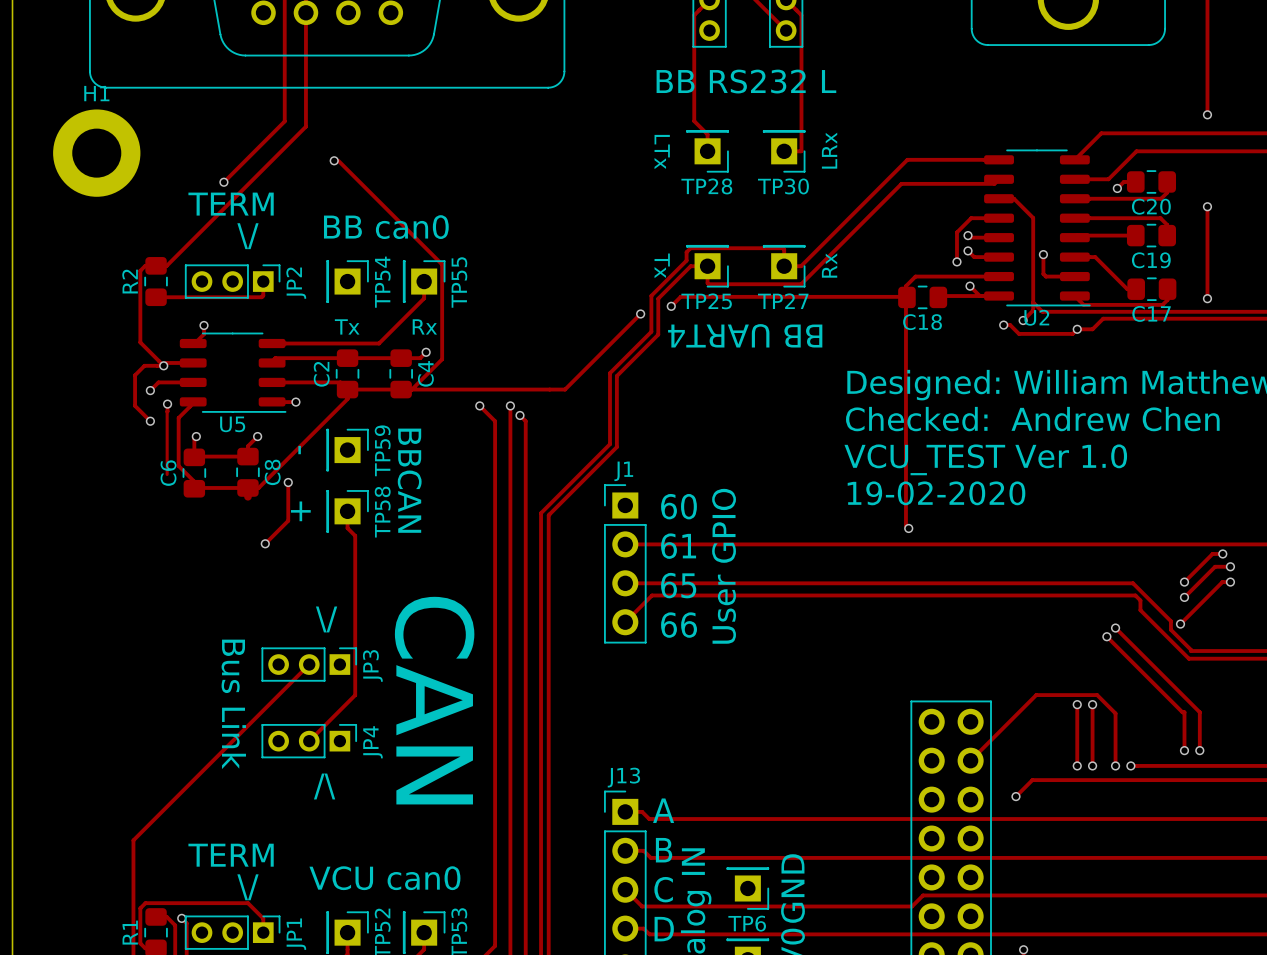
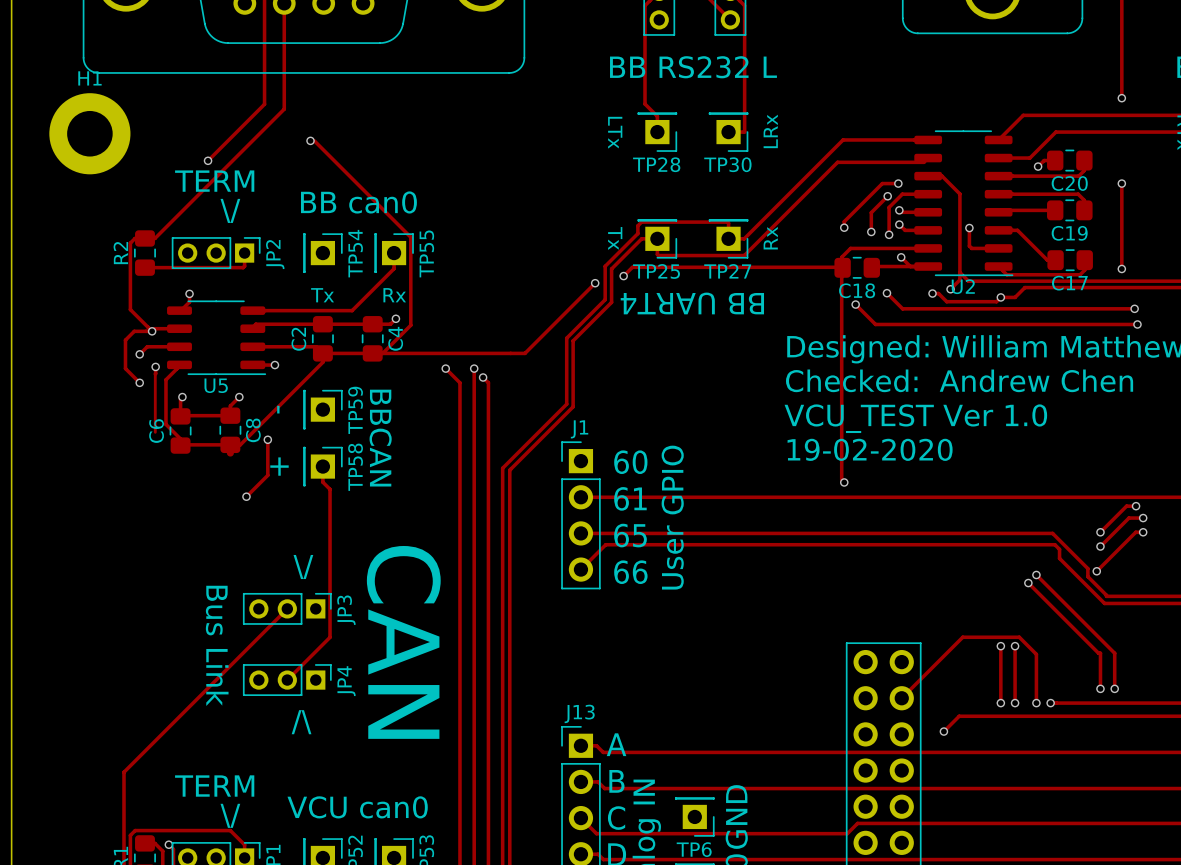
track: none -> (898, 183) (882, 183) (844, 221) (844, 227)
via: none -> (898, 183)
track: none -> (887, 196) (871, 212) (871, 231)
via: none -> (887, 196)
via: none -> (844, 227)
via: none -> (871, 231)
track: none -> (886, 293) (902, 308) (1134, 308)
via: none -> (886, 293)
track: none -> (855, 304) (875, 324) (1137, 324)
via: none -> (855, 304)
via: none -> (1134, 308)
via: none -> (1137, 324)

